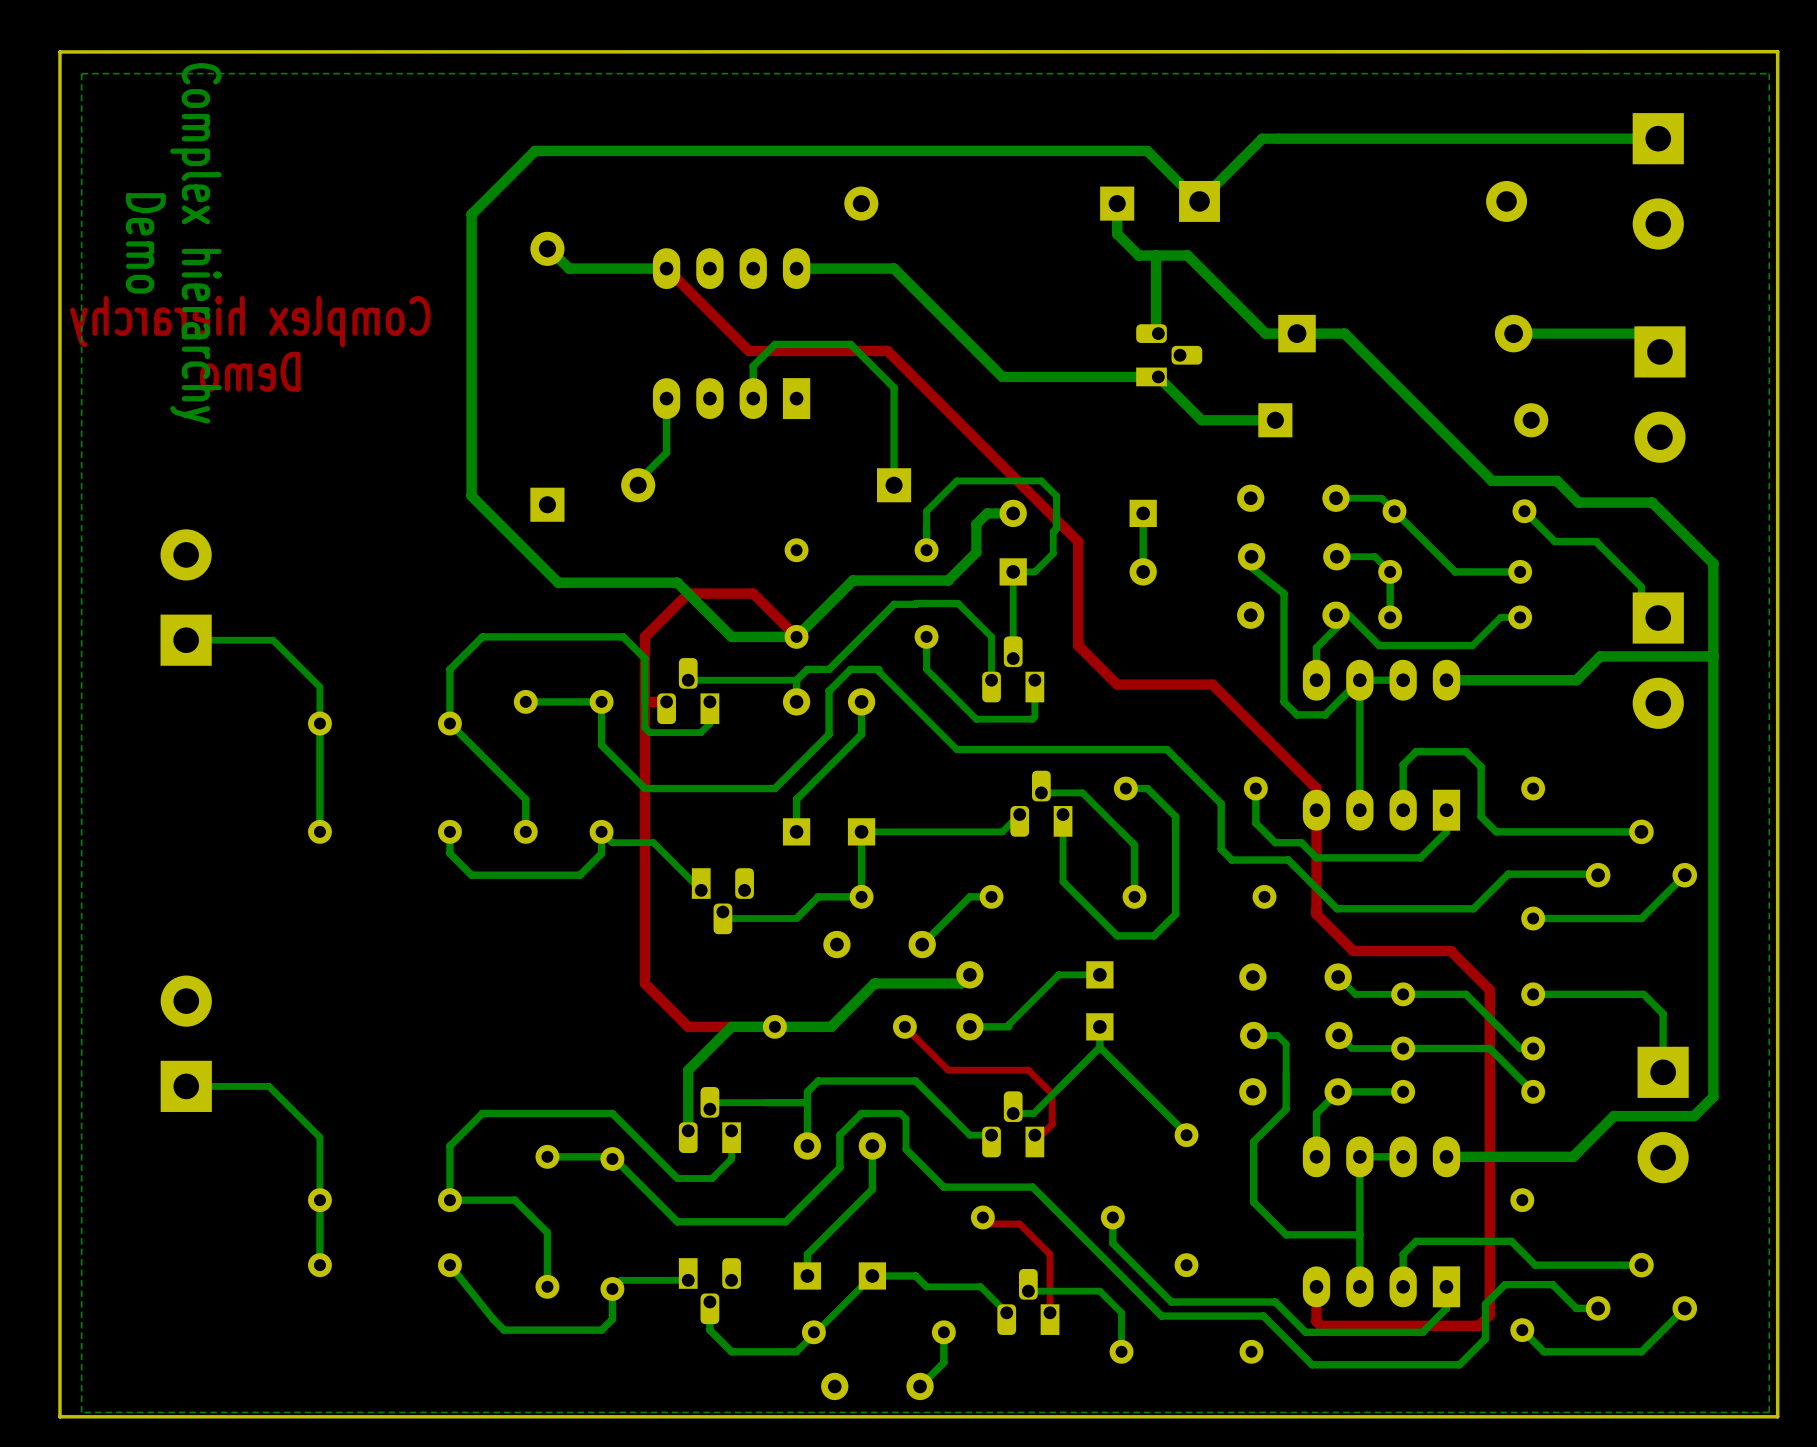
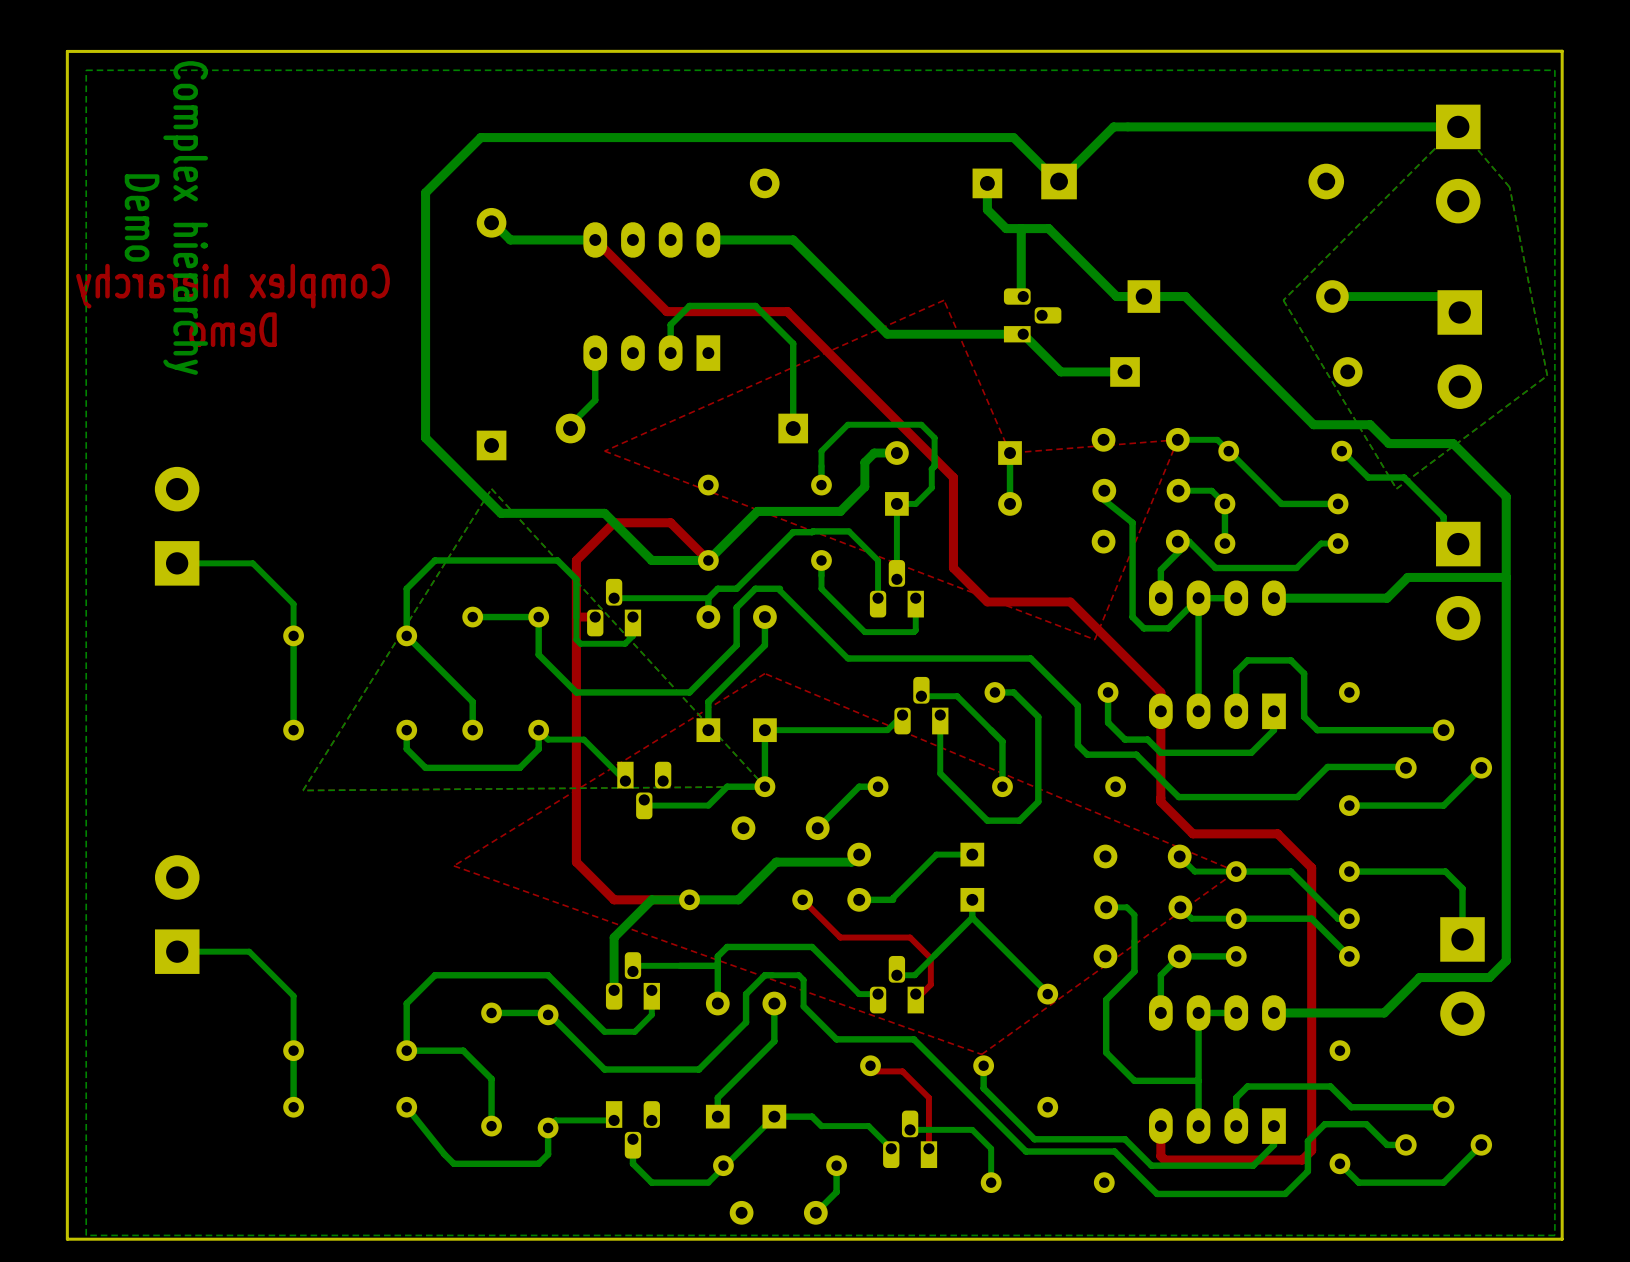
bottom zone outline: none -> (1458, 126) (1509, 187) (1547, 375) (1396, 488) (1283, 300) (1458, 126)
top zone outline: none -> (944, 300) (604, 451) (1094, 639) (1177, 439) (1010, 453) (944, 300)
bottom zone outline: none -> (491, 488) (303, 790) (764, 786) (491, 488)
top zone outline: none -> (764, 673) (453, 865) (981, 1054) (1236, 871) (764, 673)

